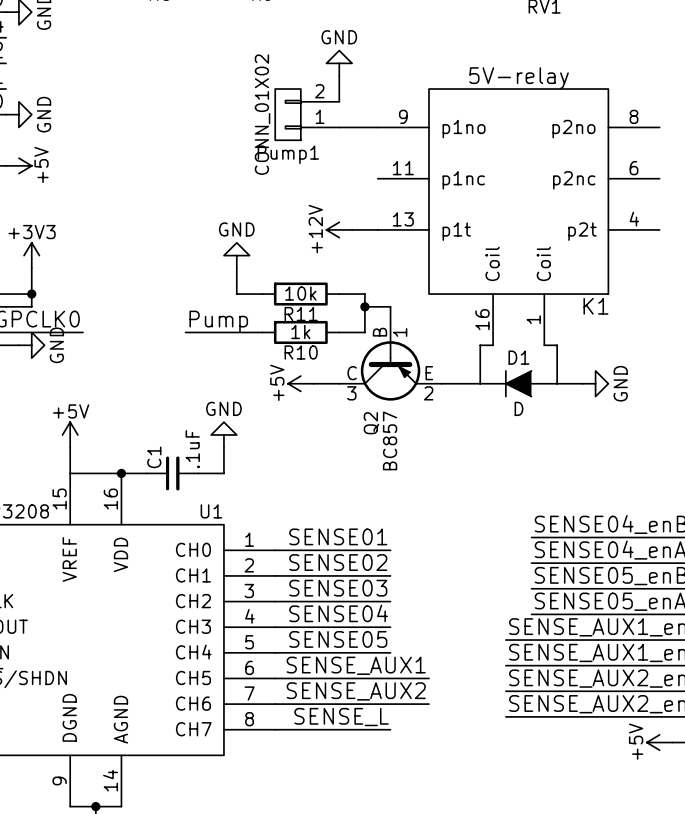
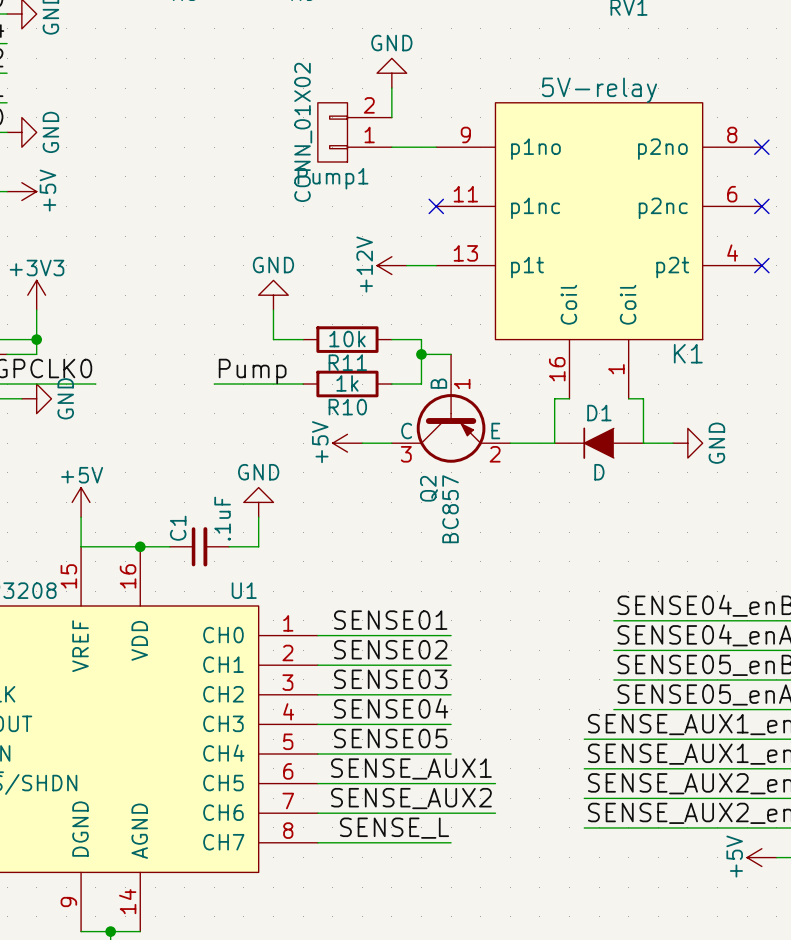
no-connect mark: none -> (761, 147)
no-connect mark: none -> (436, 206)
no-connect mark: none -> (761, 206)
no-connect mark: none -> (761, 265)

